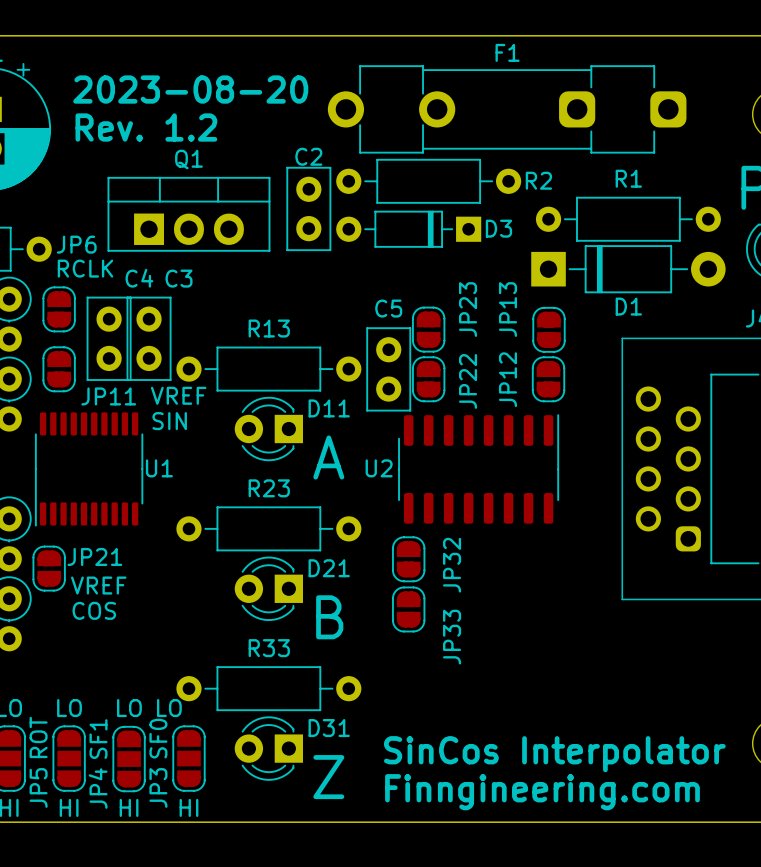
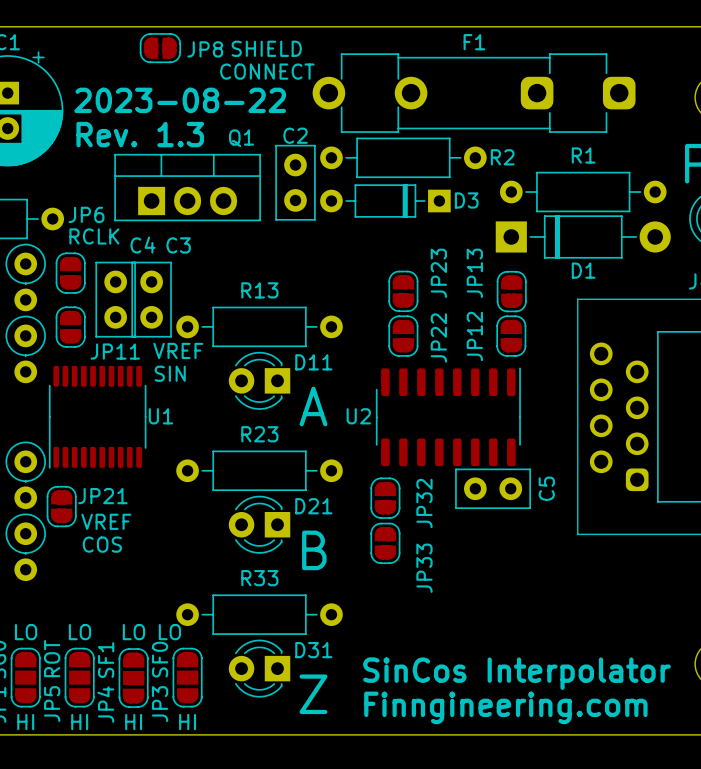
JP8: none -> (160, 48)
text: none -> SHIELD (266, 48)
text: none -> CONNECT (267, 71)
text: 2023-08-20 (190, 89) -> none
text: Rev. 1.2 (146, 127) -> 2023-08-22 (180, 100)
text: none -> Rev. 1.3 (140, 134)
Q1 name position: Q1 (188, 159) -> Q1 (241, 138)
C5 rotation: 0° (388, 369) -> 90° clockwise (493, 488)
C5 position: (388, 369) -> (493, 488)

